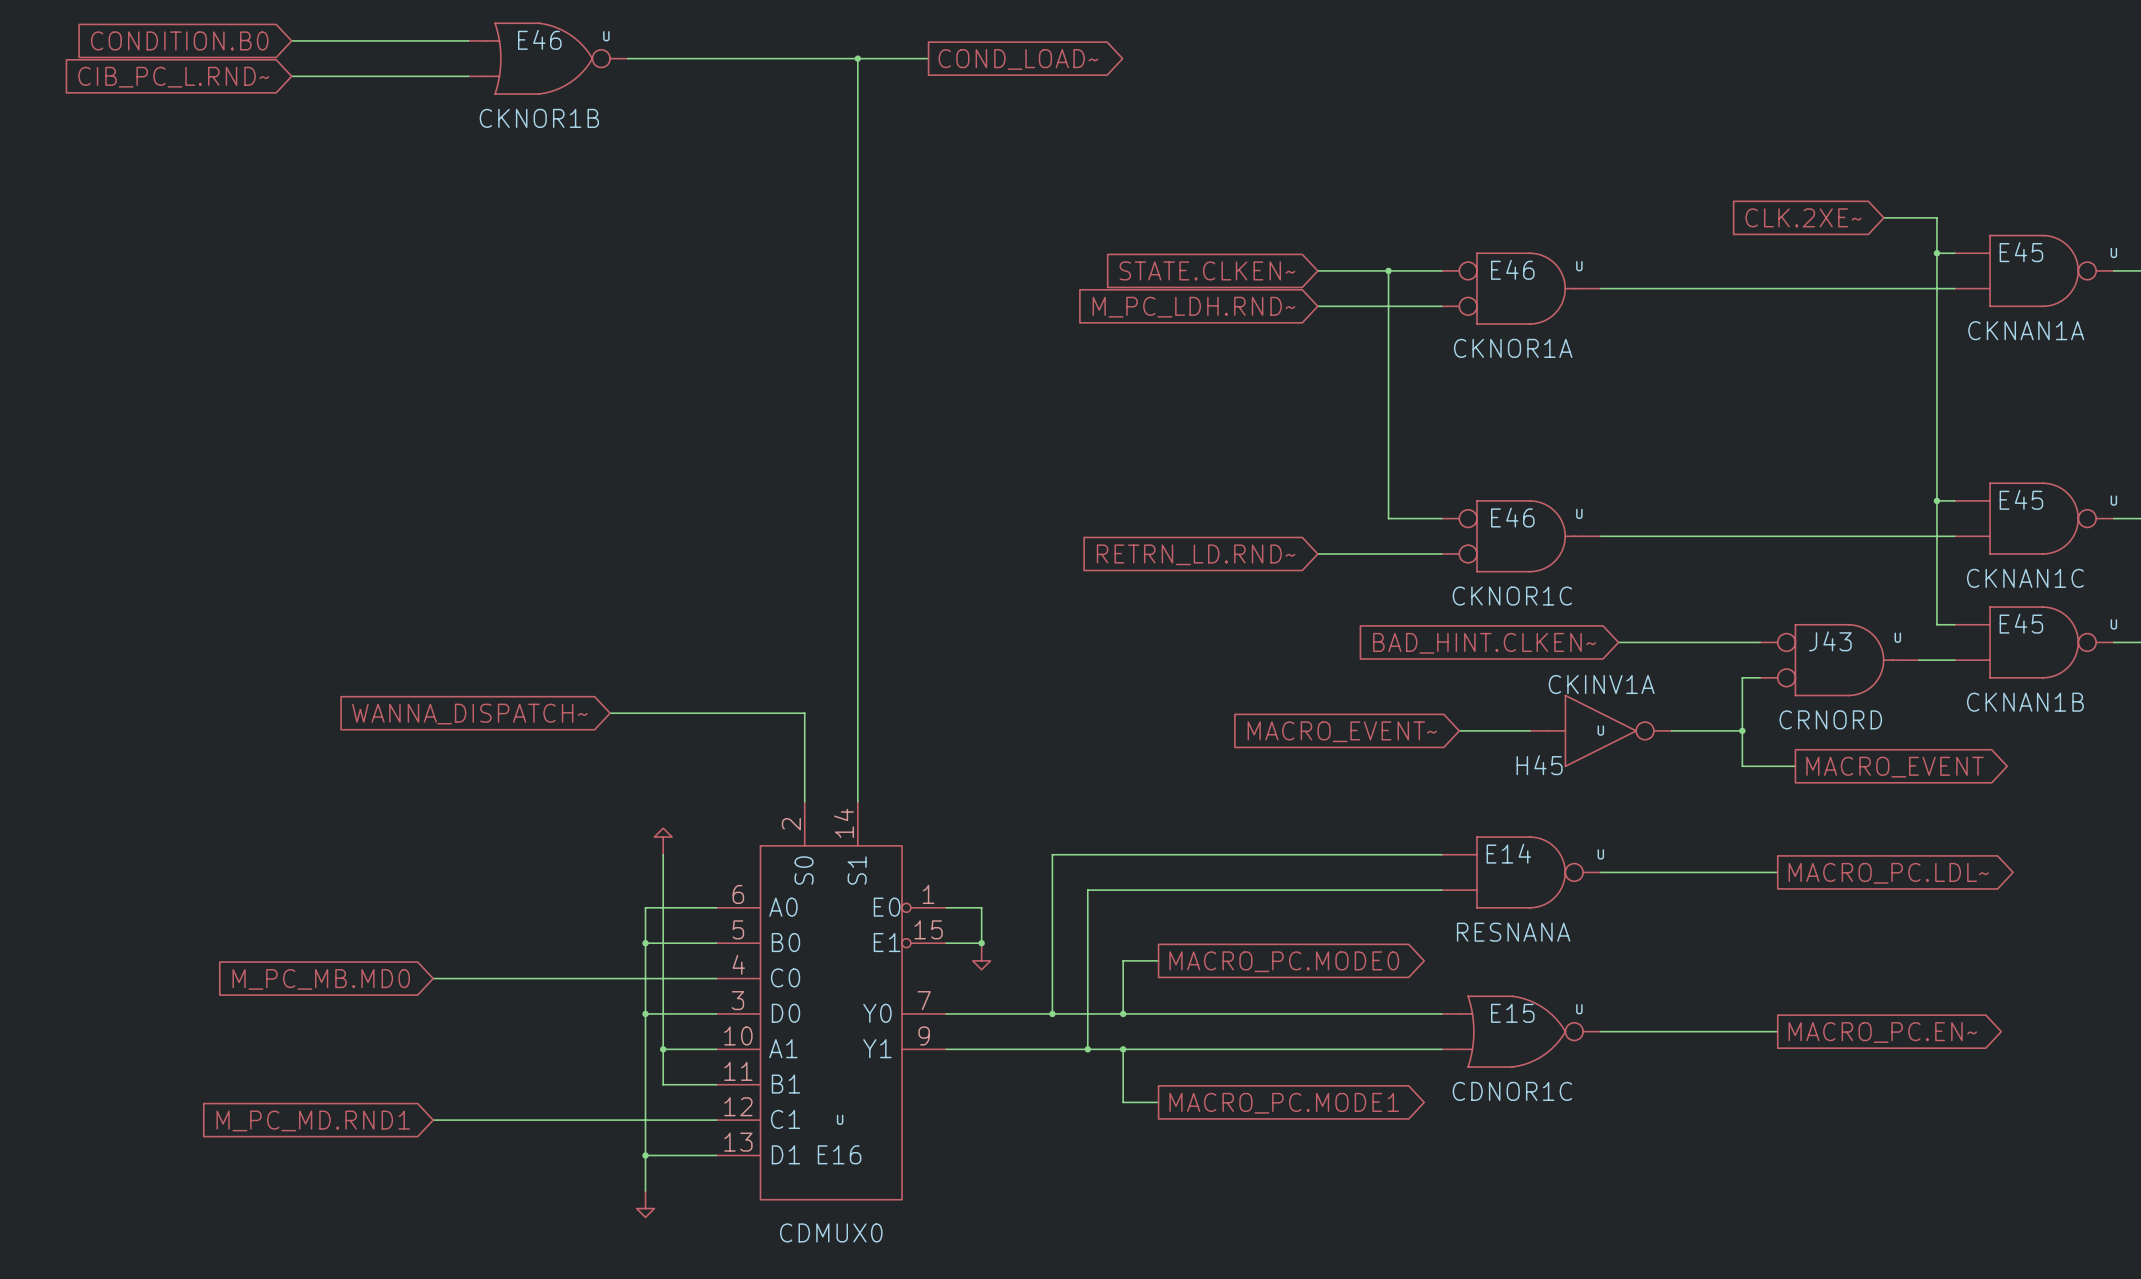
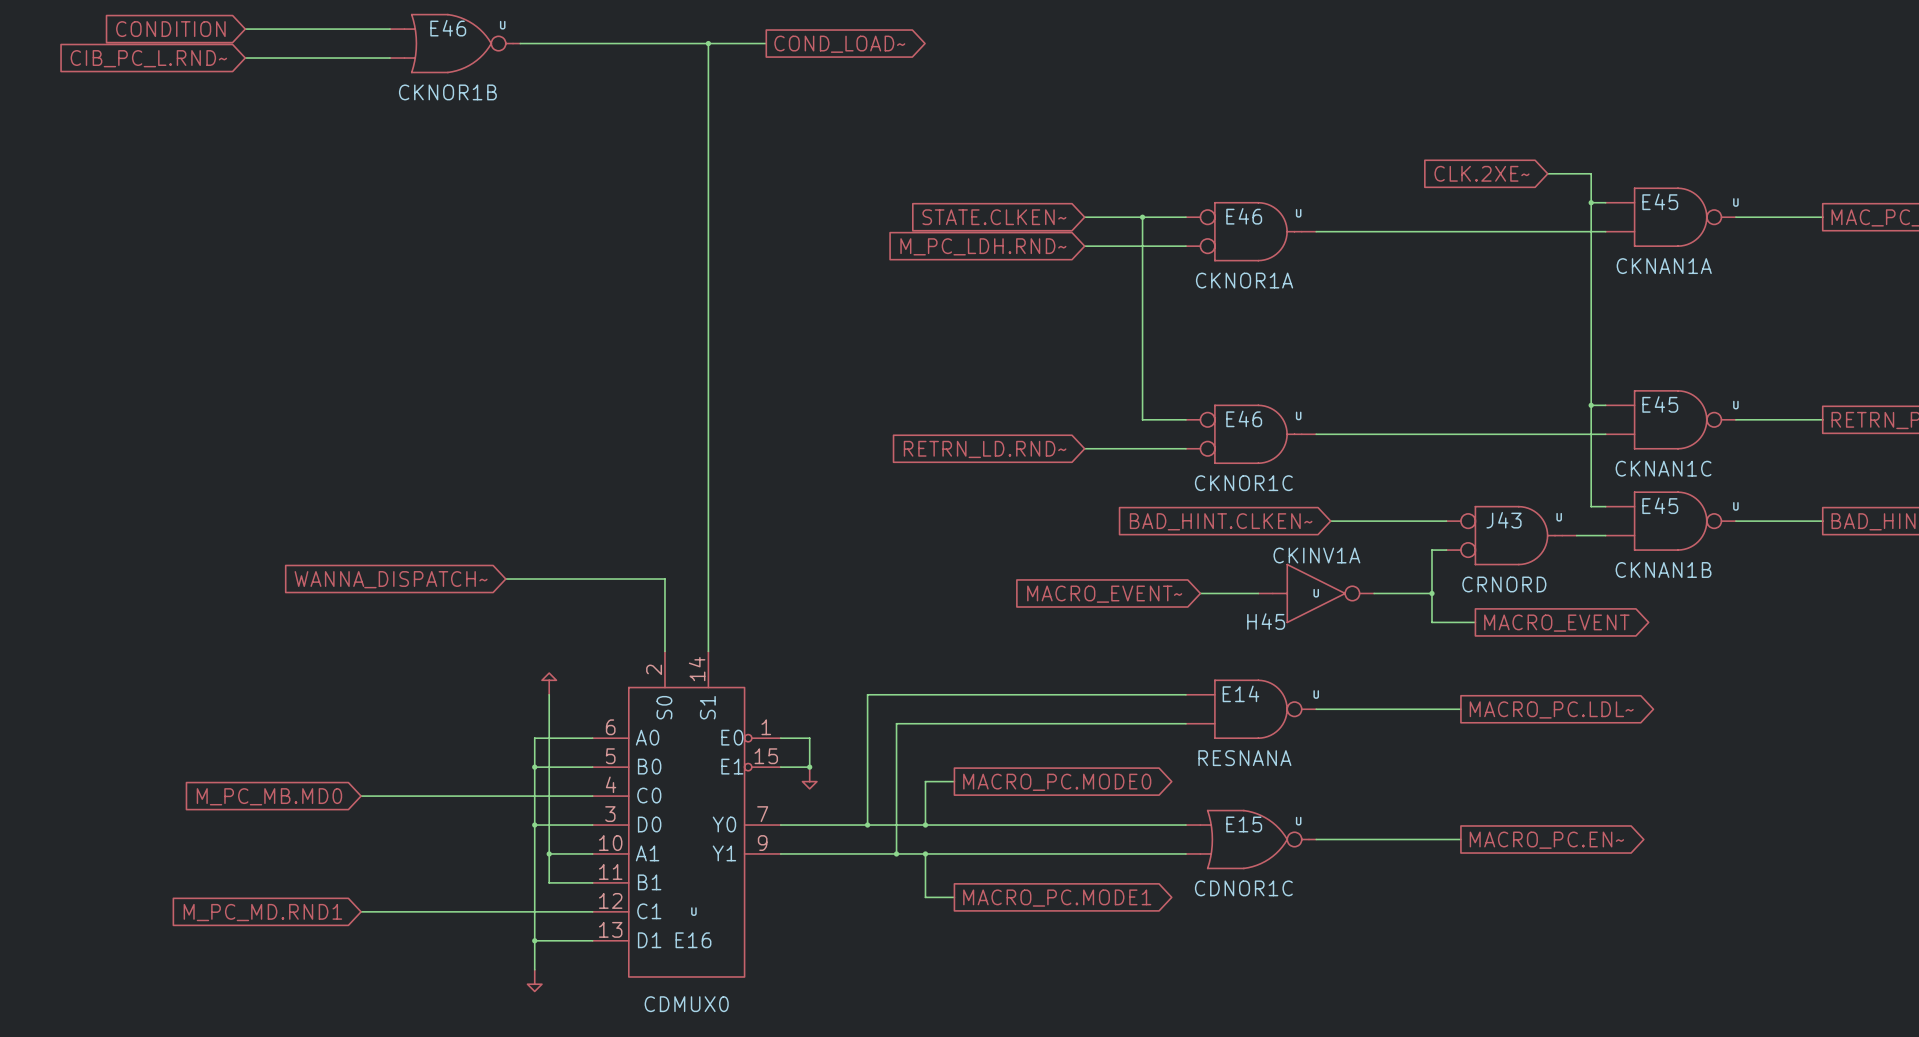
global label: CONDITION.B0 (179, 40) -> CONDITION (170, 29)

